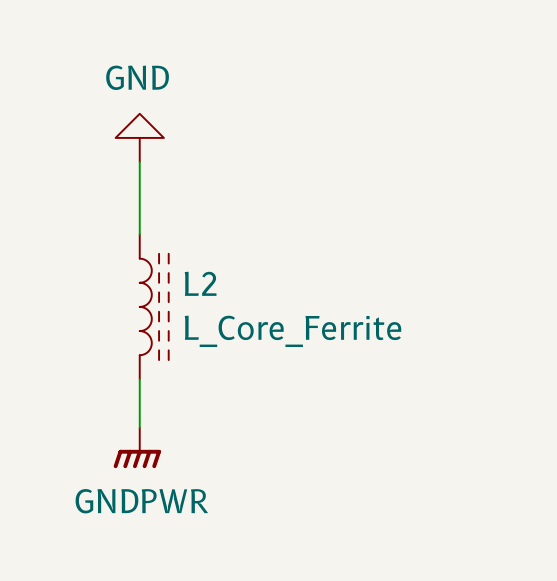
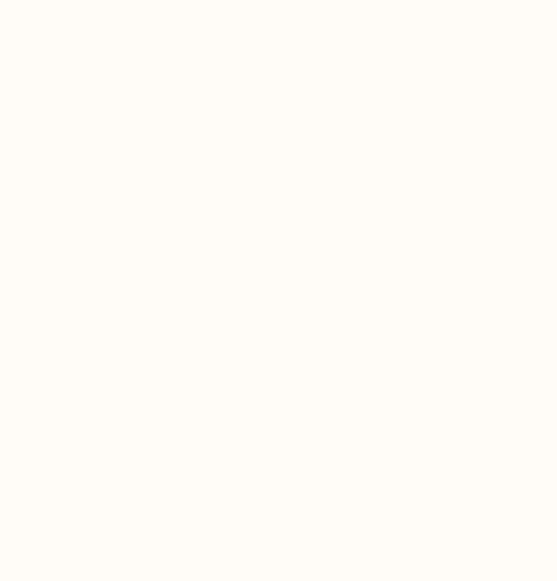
power symbol: GND (139, 137) -> none
wire: (139, 162) (139, 234) -> none
L2: L_Core_Ferrite (154, 306) -> none
wire: (139, 379) (139, 427) -> none
power symbol: GNDPWR (137, 447) -> none

